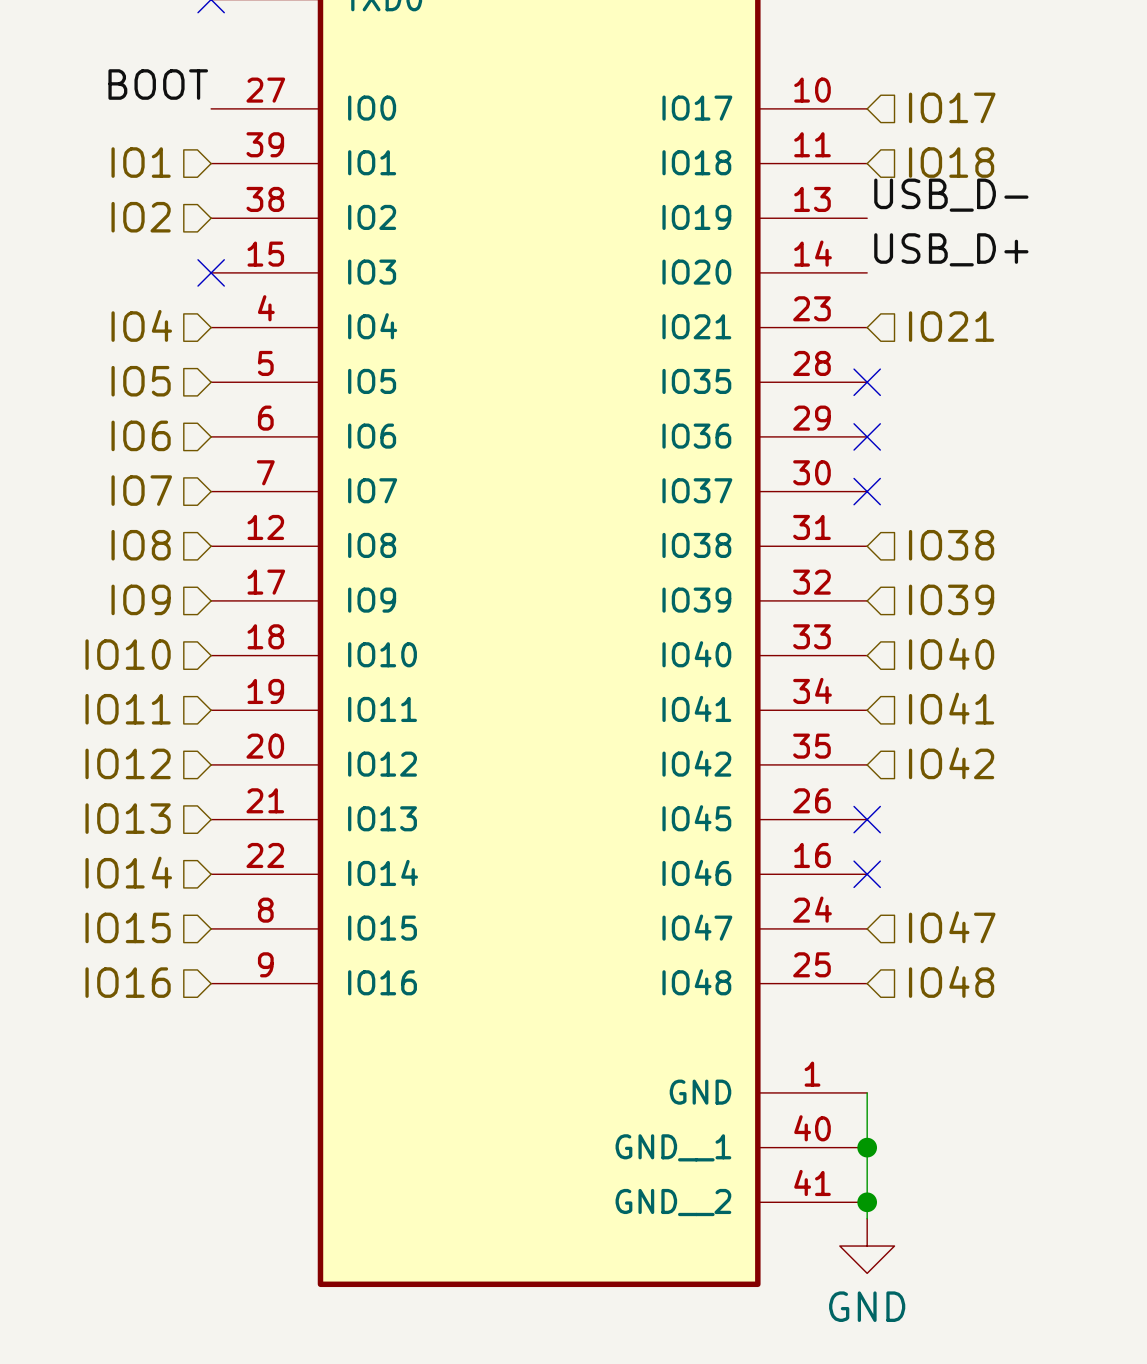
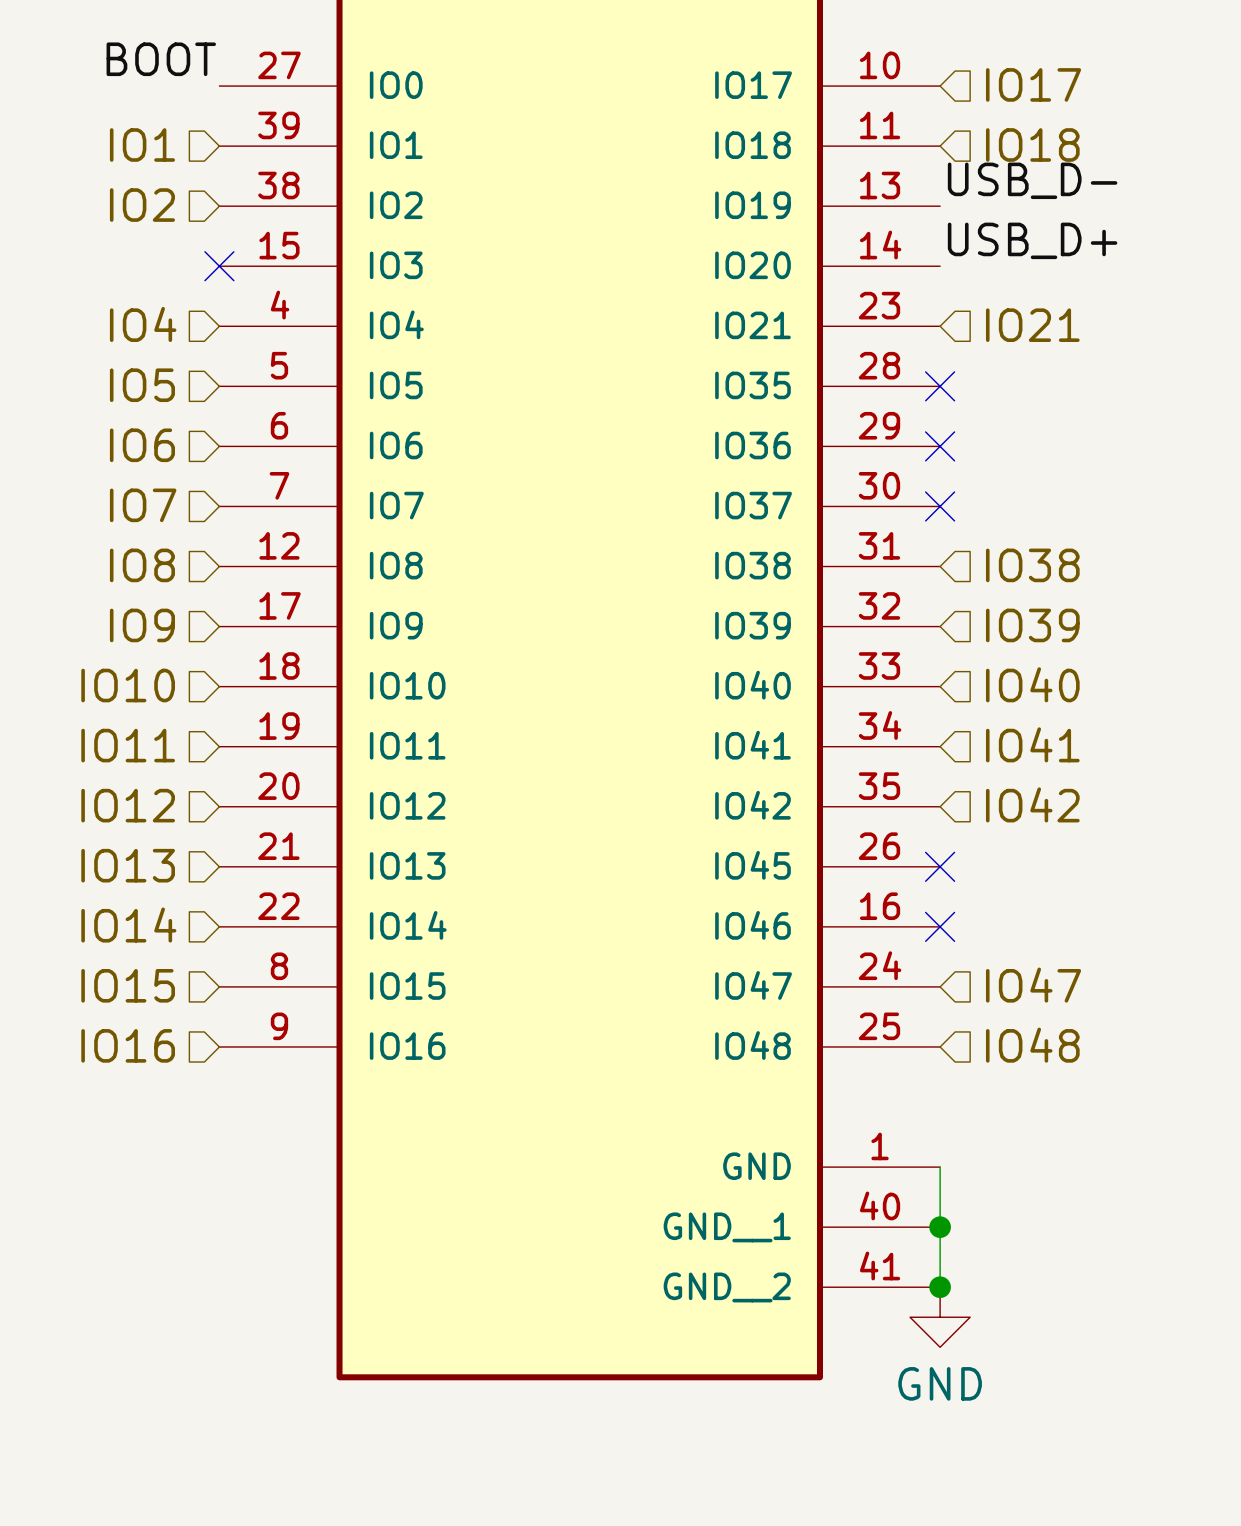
power symbol position: GND (867, 1246) -> GND (940, 1317)

